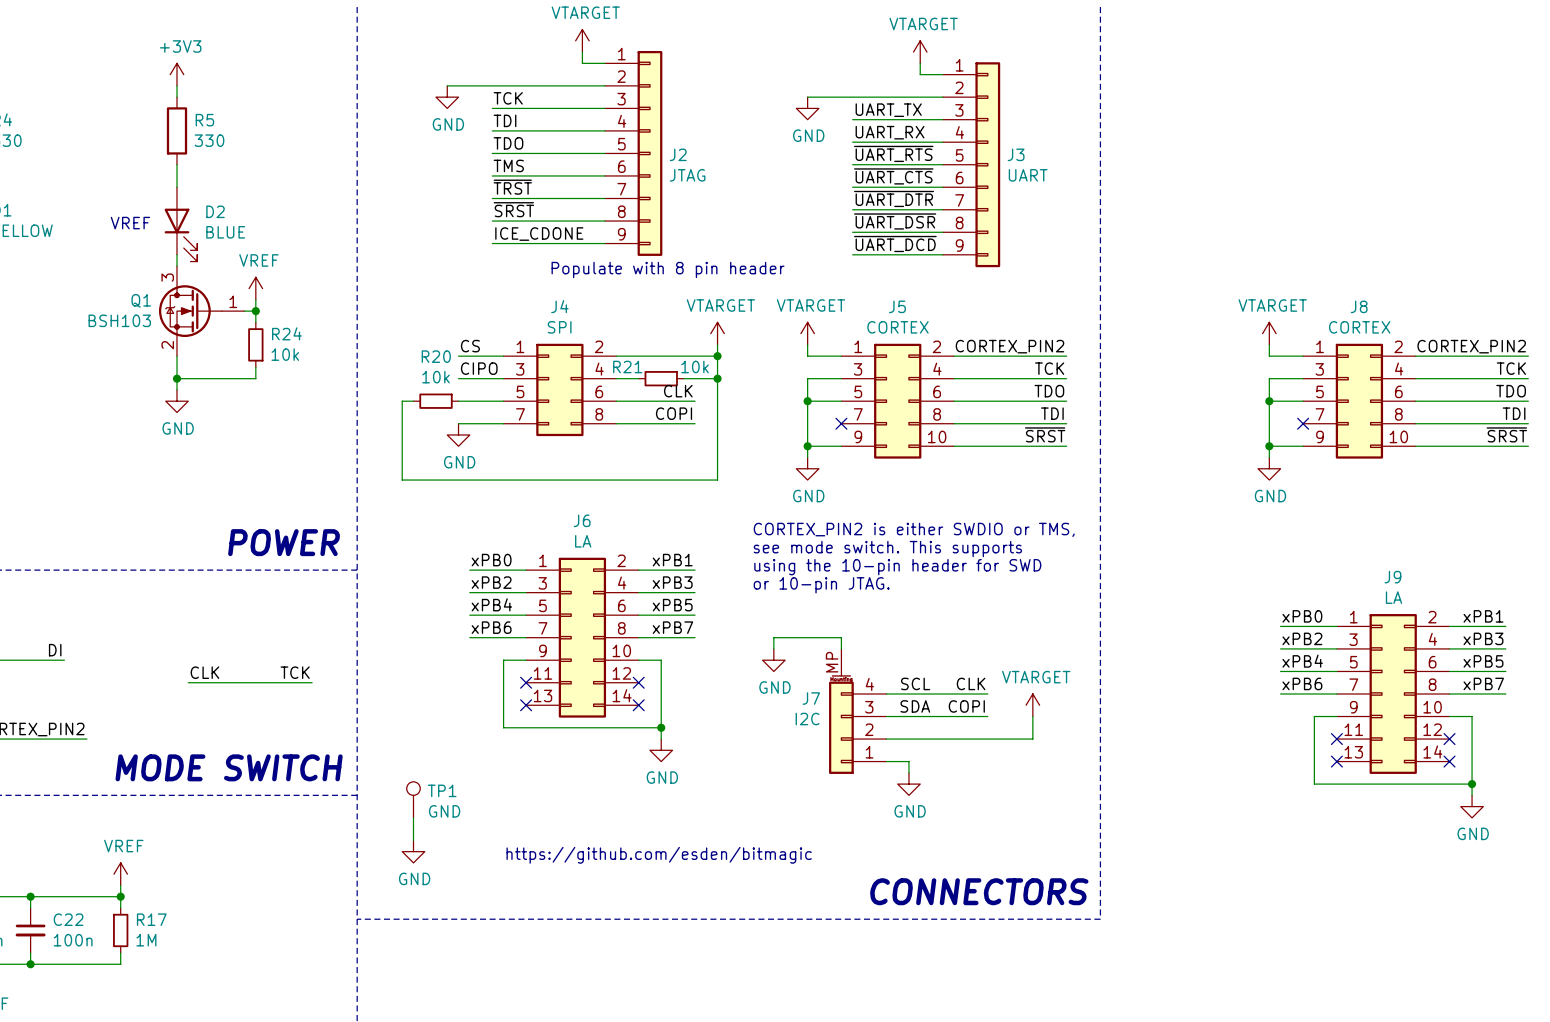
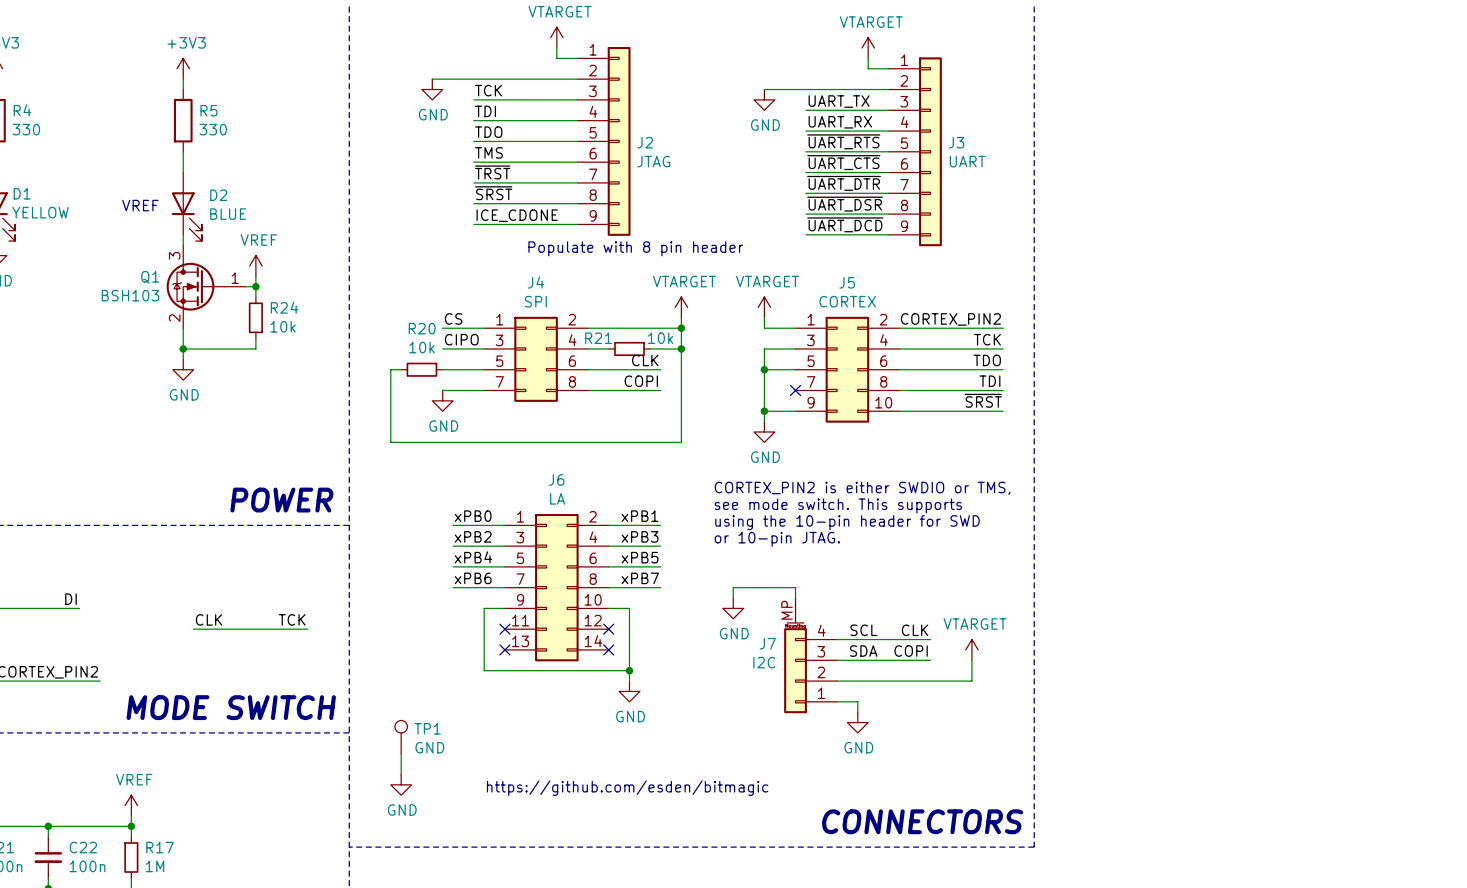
power symbol: VTARGET (1269, 333) -> none
wire: (1269, 344) (1269, 356) (1303, 356) -> none
label: CORTEX_PIN2 (1471, 346) -> none
wire: (1415, 356) (1528, 356) -> none
label: TCK (1511, 368) -> none
wire: (1303, 378) (1269, 378) (1269, 457) -> none
wire: (1415, 378) (1528, 378) -> none
label: TDO (1511, 391) -> none
wire: (1269, 401) (1303, 401) -> none
junction: (1269, 401) -> none
J8: CORTEX (1359, 401) -> none
wire: (1415, 401) (1528, 401) -> none
label: TDI (1514, 413) -> none
no-connect mark: (1303, 423) -> none
wire: (1415, 423) (1528, 423) -> none
label: ~{SRST} (1506, 434) -> none
wire: (1269, 446) (1303, 446) -> none
junction: (1269, 446) -> none
wire: (1415, 446) (1528, 446) -> none
power symbol: GND (1269, 468) -> none
label: xPB0 (1302, 616) -> none
label: xPB1 (1483, 616) -> none
wire: (1280, 626) (1336, 626) -> none
wire: (1449, 626) (1505, 626) -> none
label: xPB2 (1302, 638) -> none
label: xPB3 (1483, 638) -> none
wire: (1280, 648) (1336, 648) -> none
wire: (1449, 648) (1505, 648) -> none
label: xPB4 (1302, 661) -> none
label: xPB5 (1483, 661) -> none
wire: (1280, 671) (1336, 671) -> none
wire: (1449, 671) (1505, 671) -> none
label: xPB6 (1302, 683) -> none
label: xPB7 (1483, 683) -> none
wire: (1280, 693) (1336, 693) -> none
J9: LA (1393, 693) -> none
wire: (1449, 693) (1505, 693) -> none
wire: (1336, 716) (1314, 716) (1314, 784) (1472, 784) -> none
wire: (1449, 716) (1472, 716) (1472, 795) -> none
no-connect mark: (1336, 739) -> none
no-connect mark: (1449, 739) -> none
no-connect mark: (1336, 761) -> none
no-connect mark: (1449, 761) -> none
junction: (1472, 784) -> none
power symbol: GND (1472, 806) -> none

